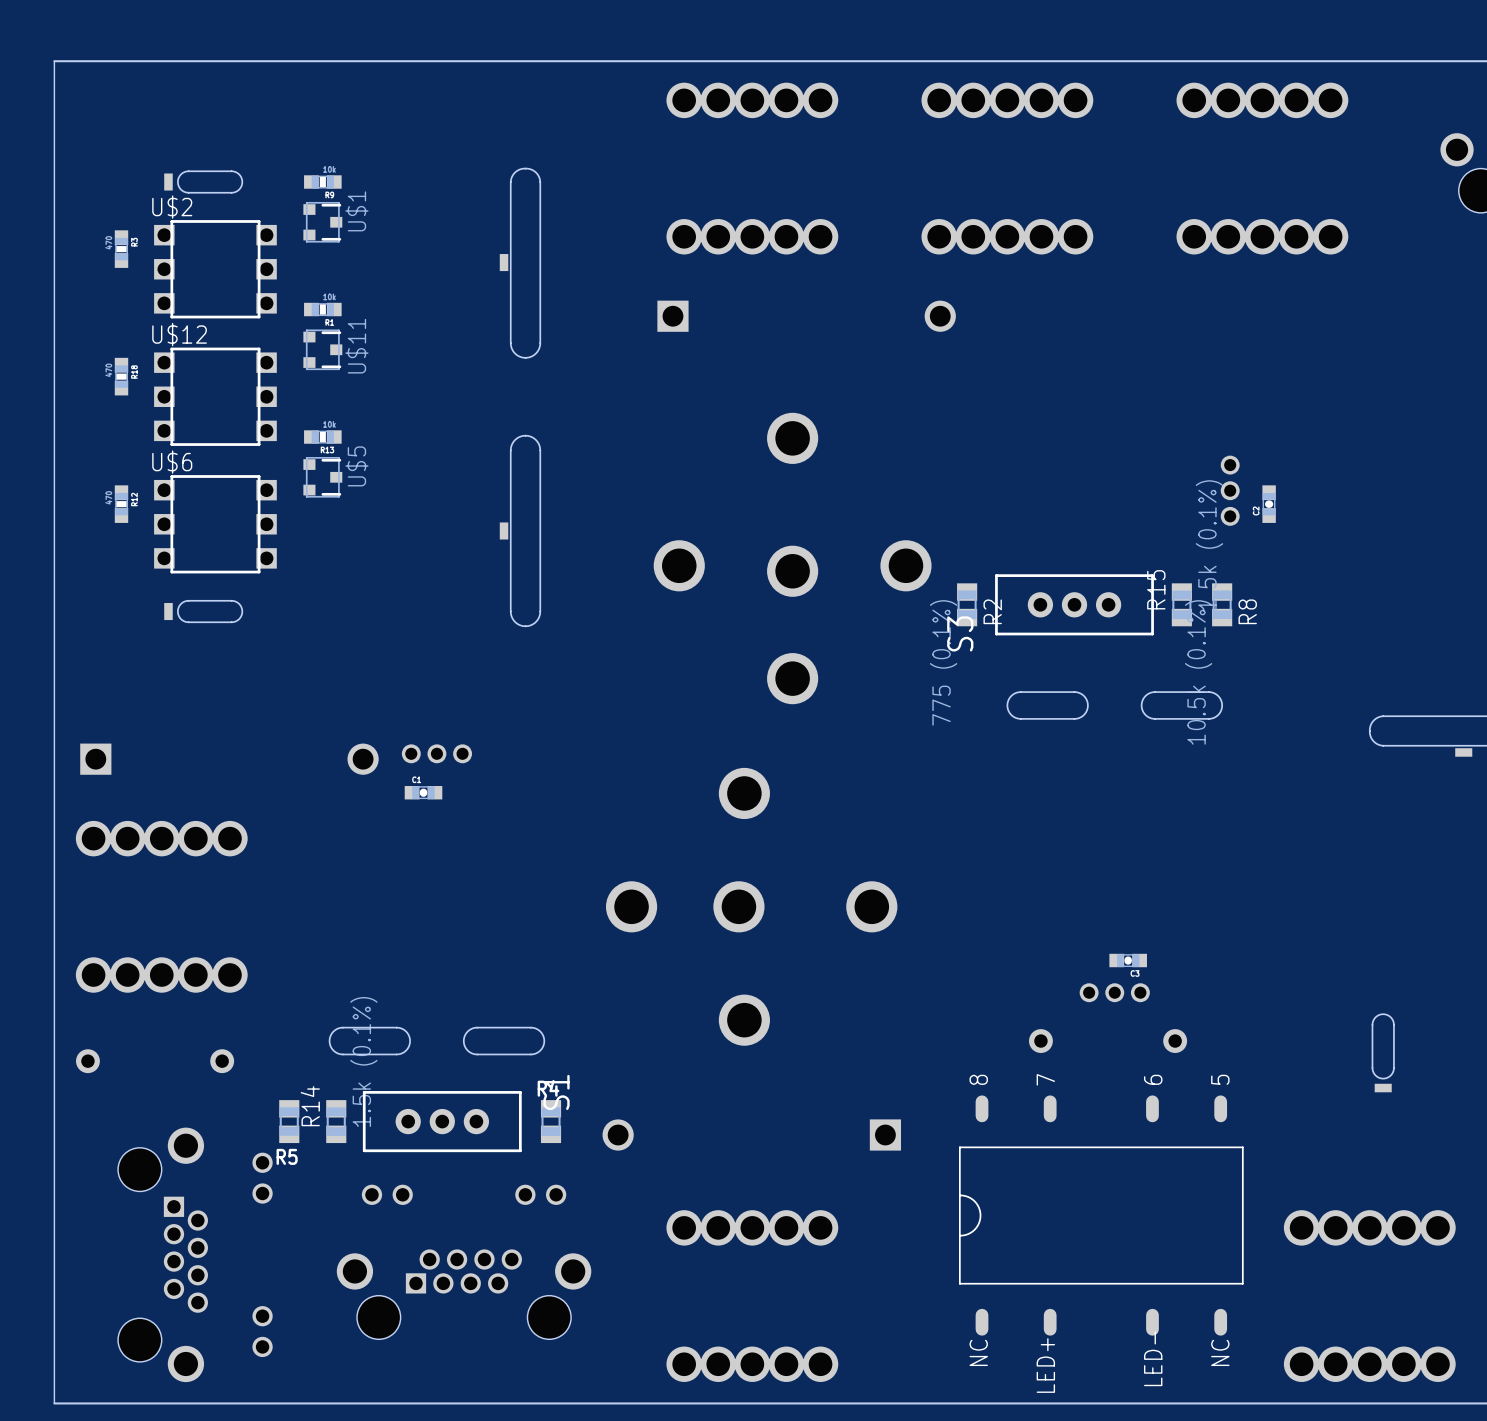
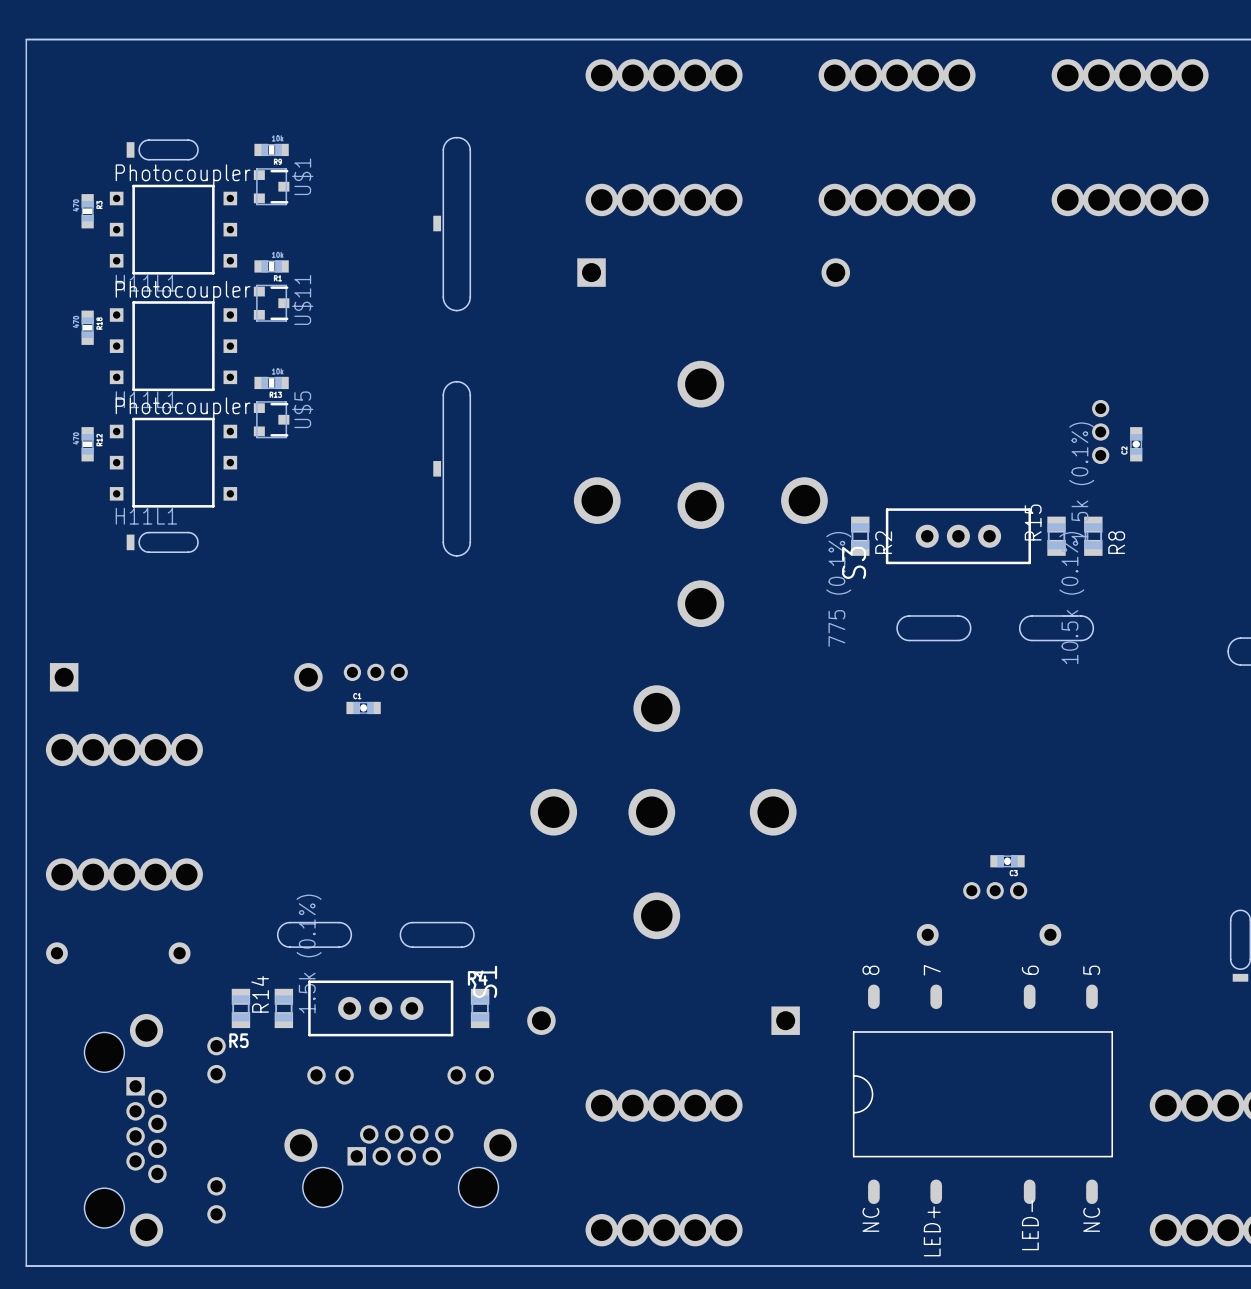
U$2: (215, 269) -> none
part: none -> (173, 229)
U$12: (215, 396) -> none
part: none -> (173, 346)
U$6: (215, 524) -> none
part: none -> (173, 462)

